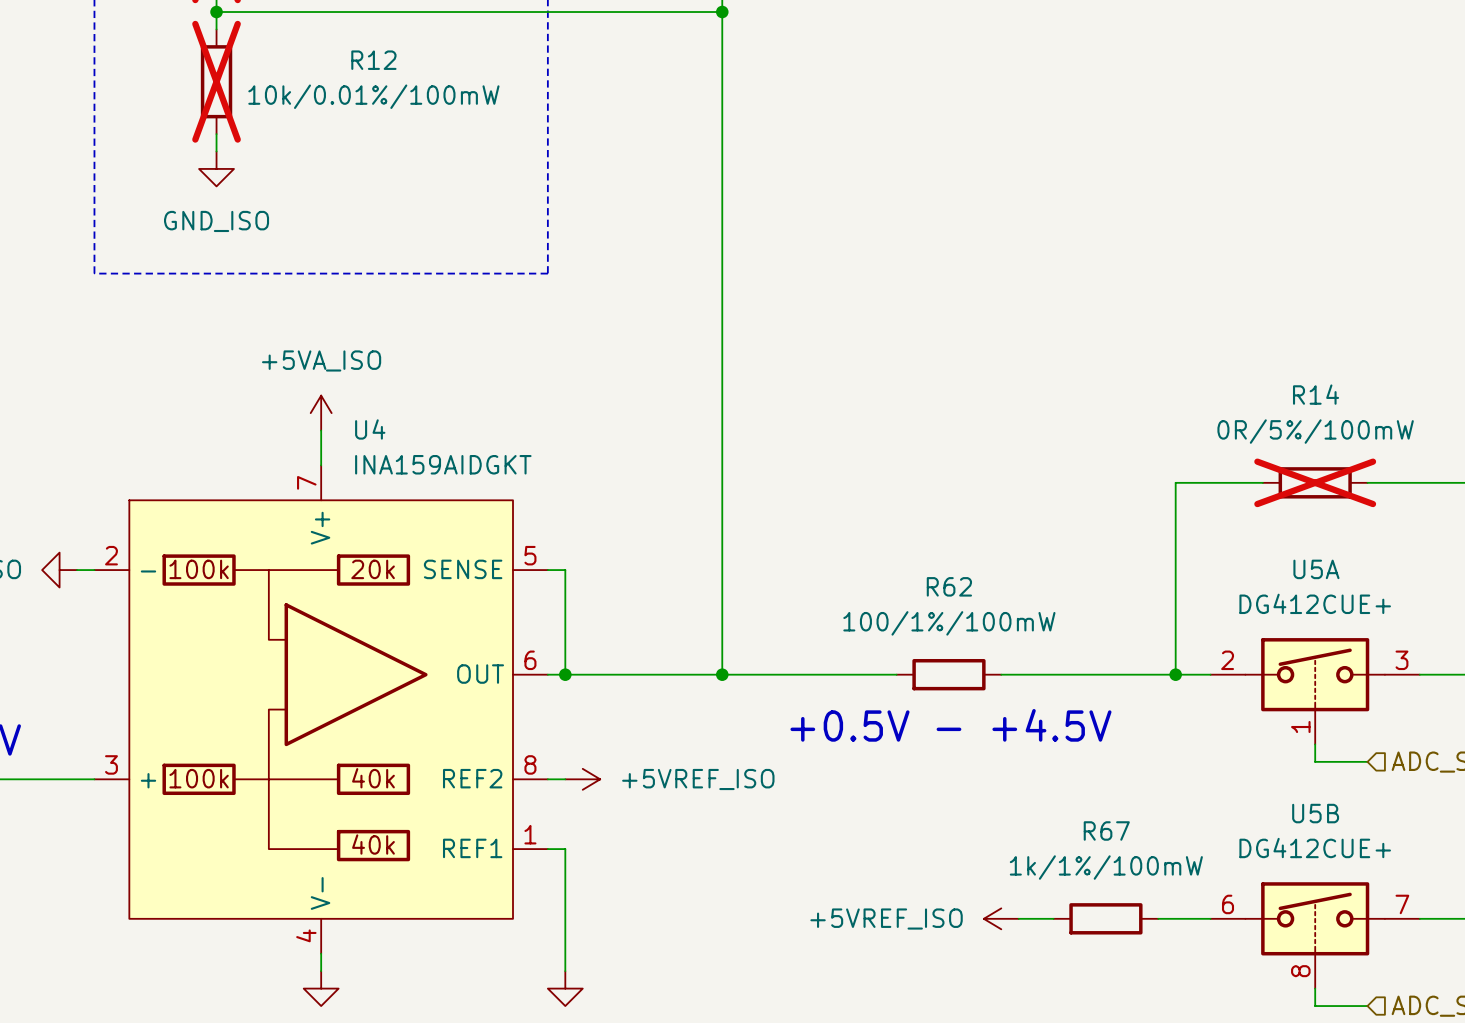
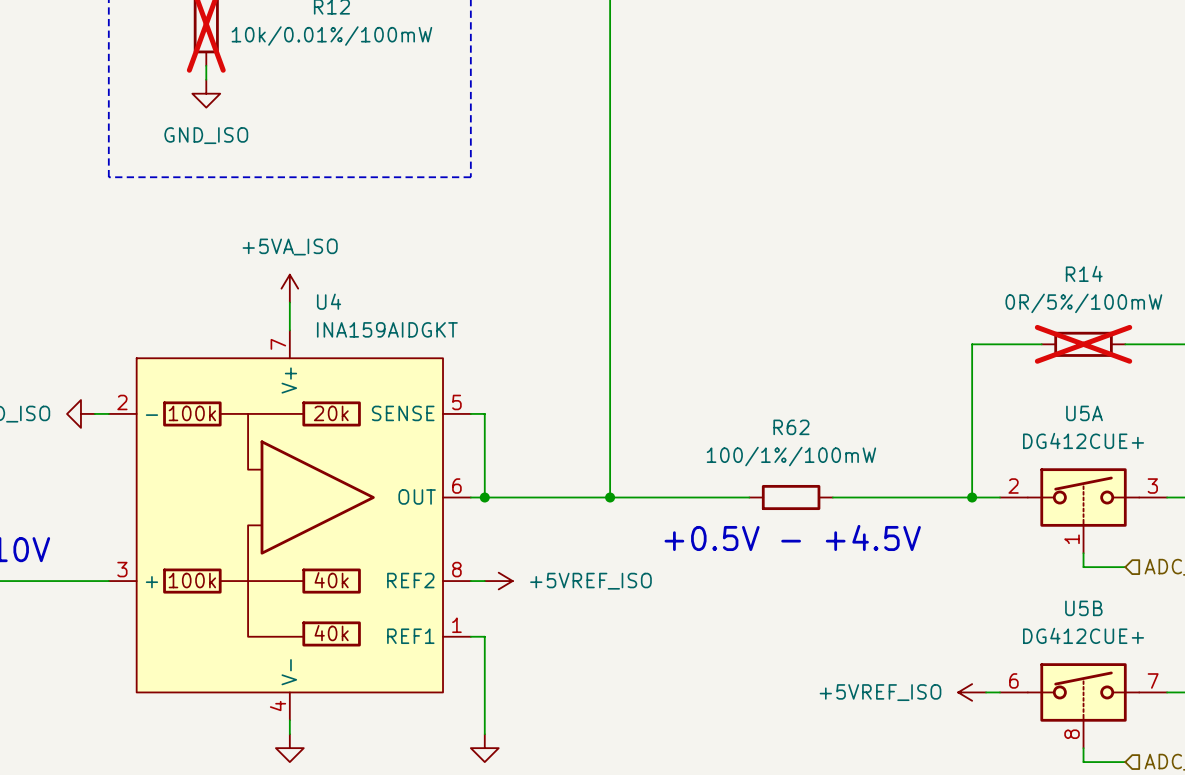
power symbol position: +5VREF_ISO (1001, 918) -> +5VREF_ISO (972, 692)
wire: (1018, 918) (1053, 918) -> none
R67: 1k/1%/100mW (1105, 918) -> none

